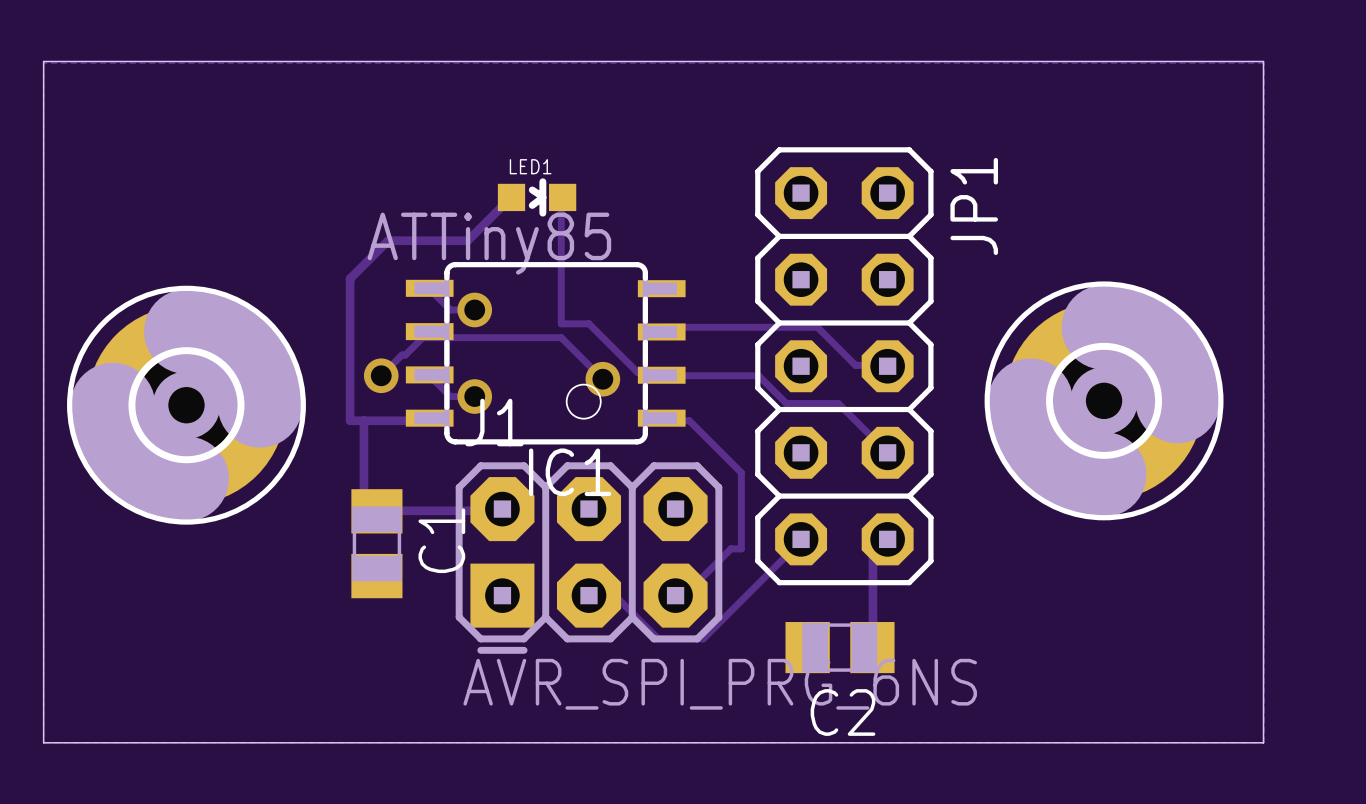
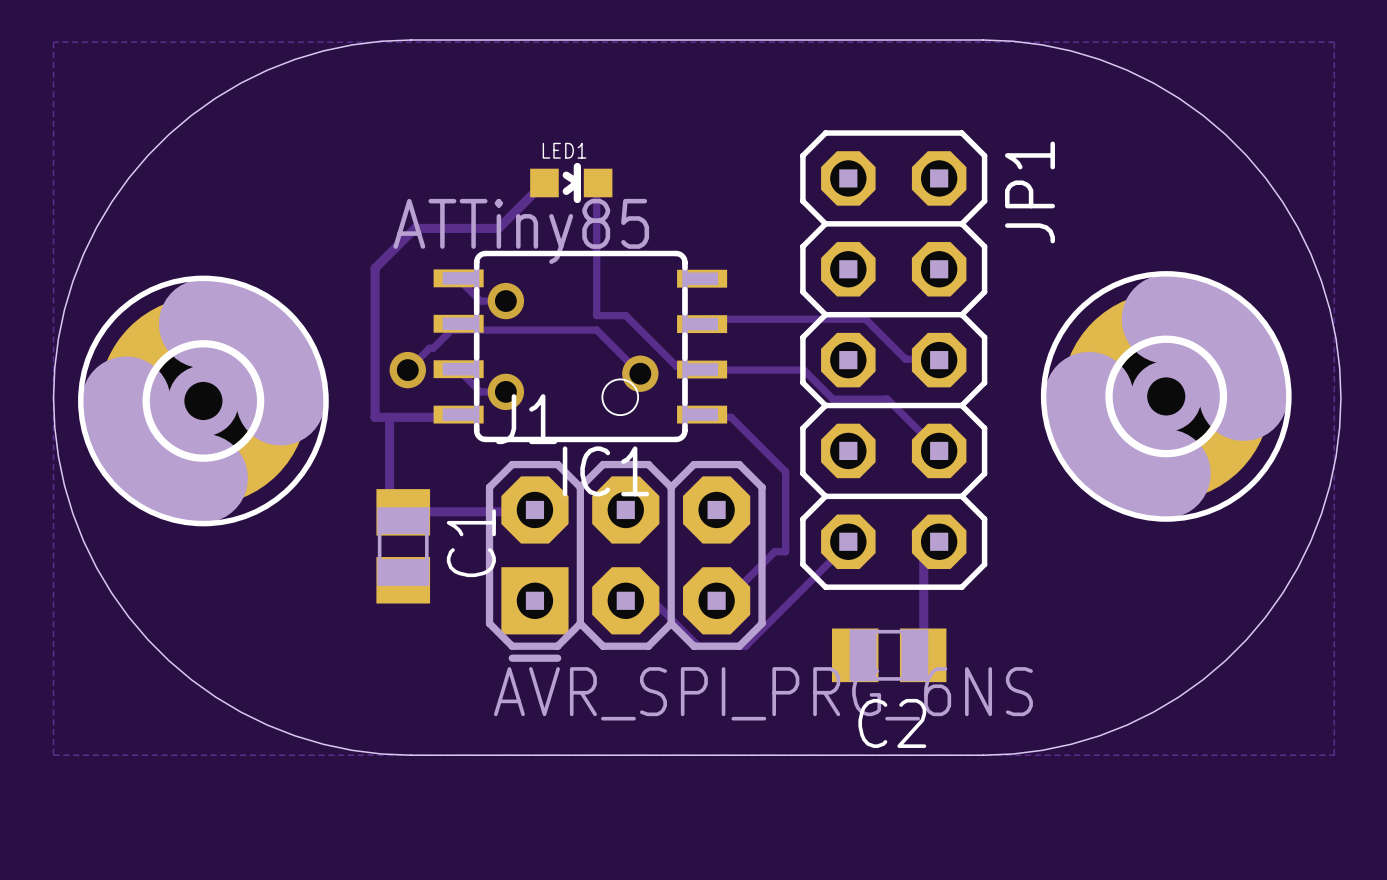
board edge: (384, 742) (43, 742) (43, 61) (1263, 61) (1263, 742) (929, 742) -> (411, 755) (352, 750) (295, 735) (267, 725) (215, 697) (168, 660) (148, 639) (111, 593) (83, 541) (64, 485) (58, 456) (53, 397) (58, 338) (72, 281) (83, 253) (111, 202) (148, 155) (168, 134) (215, 98) (267, 70) (323, 50) (352, 44) (411, 40) (983, 40) (1042, 44) (1099, 59) (1126, 70) (1178, 98) (1225, 134) (1265, 177) (1282, 202) (1310, 253) (1321, 281) (1336, 338) (1340, 397) (1336, 456) (1321, 513) (1310, 541) (1282, 593) (1265, 617) (1225, 660) (1178, 697) (1126, 725) (1099, 735) (1042, 750) (983, 755)

